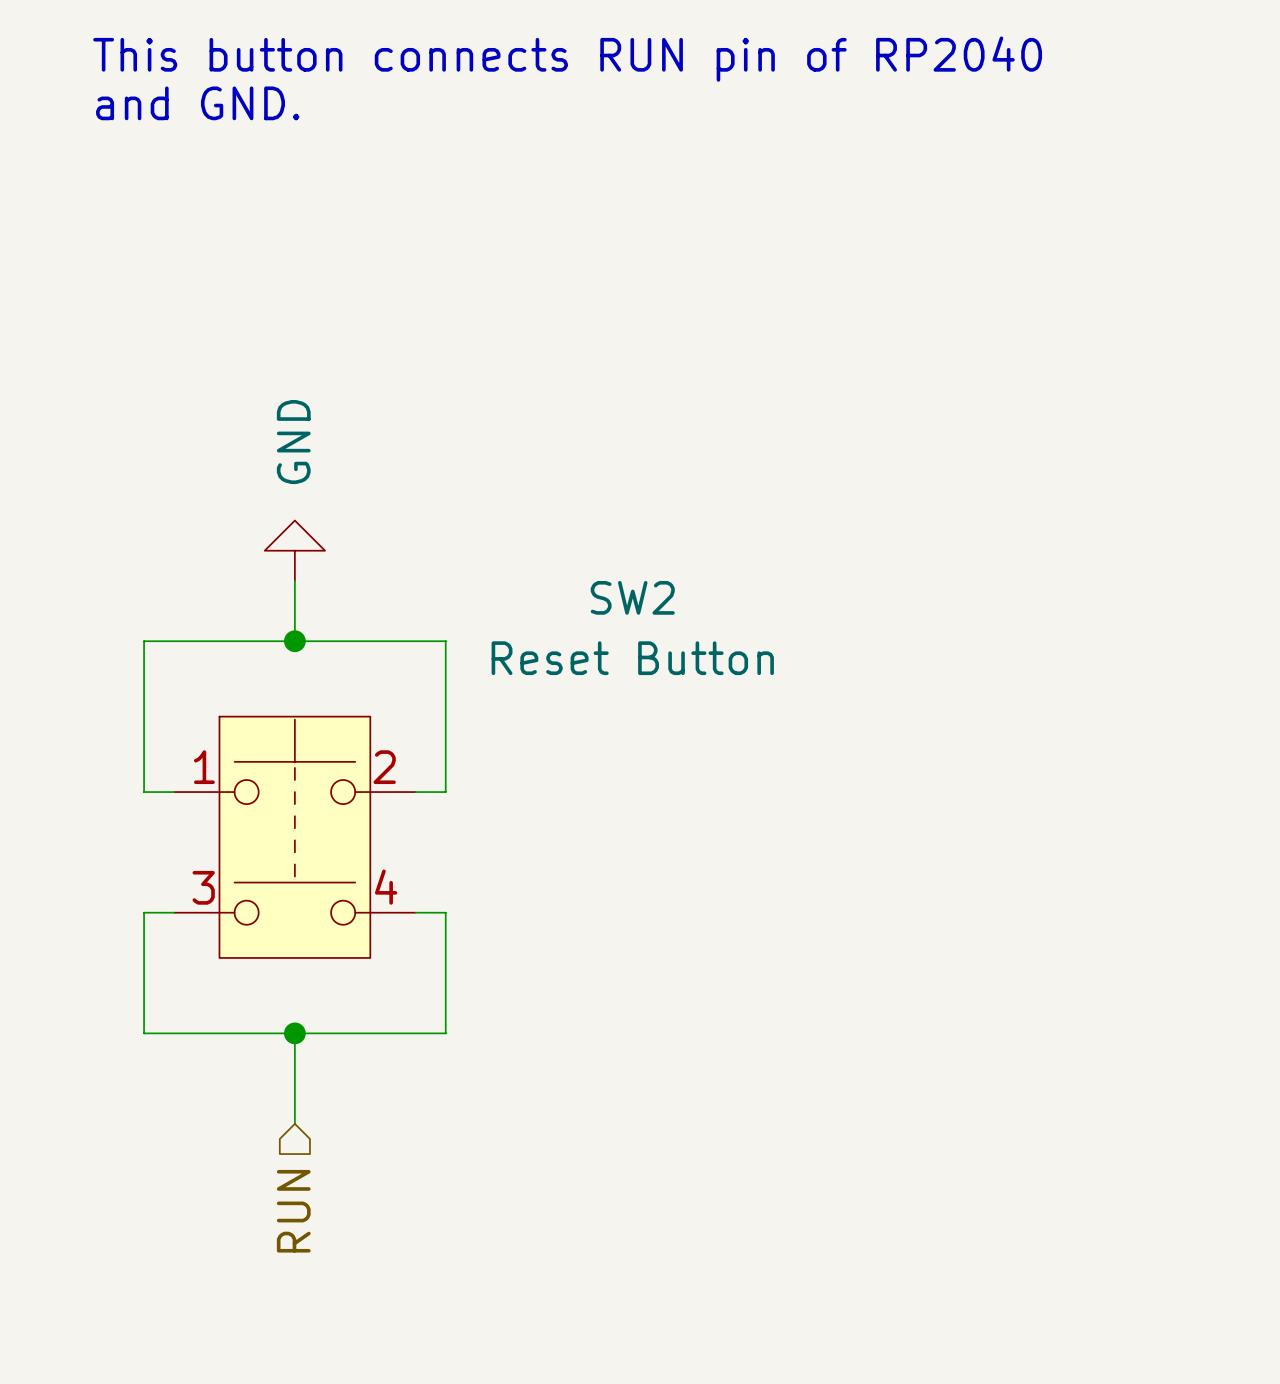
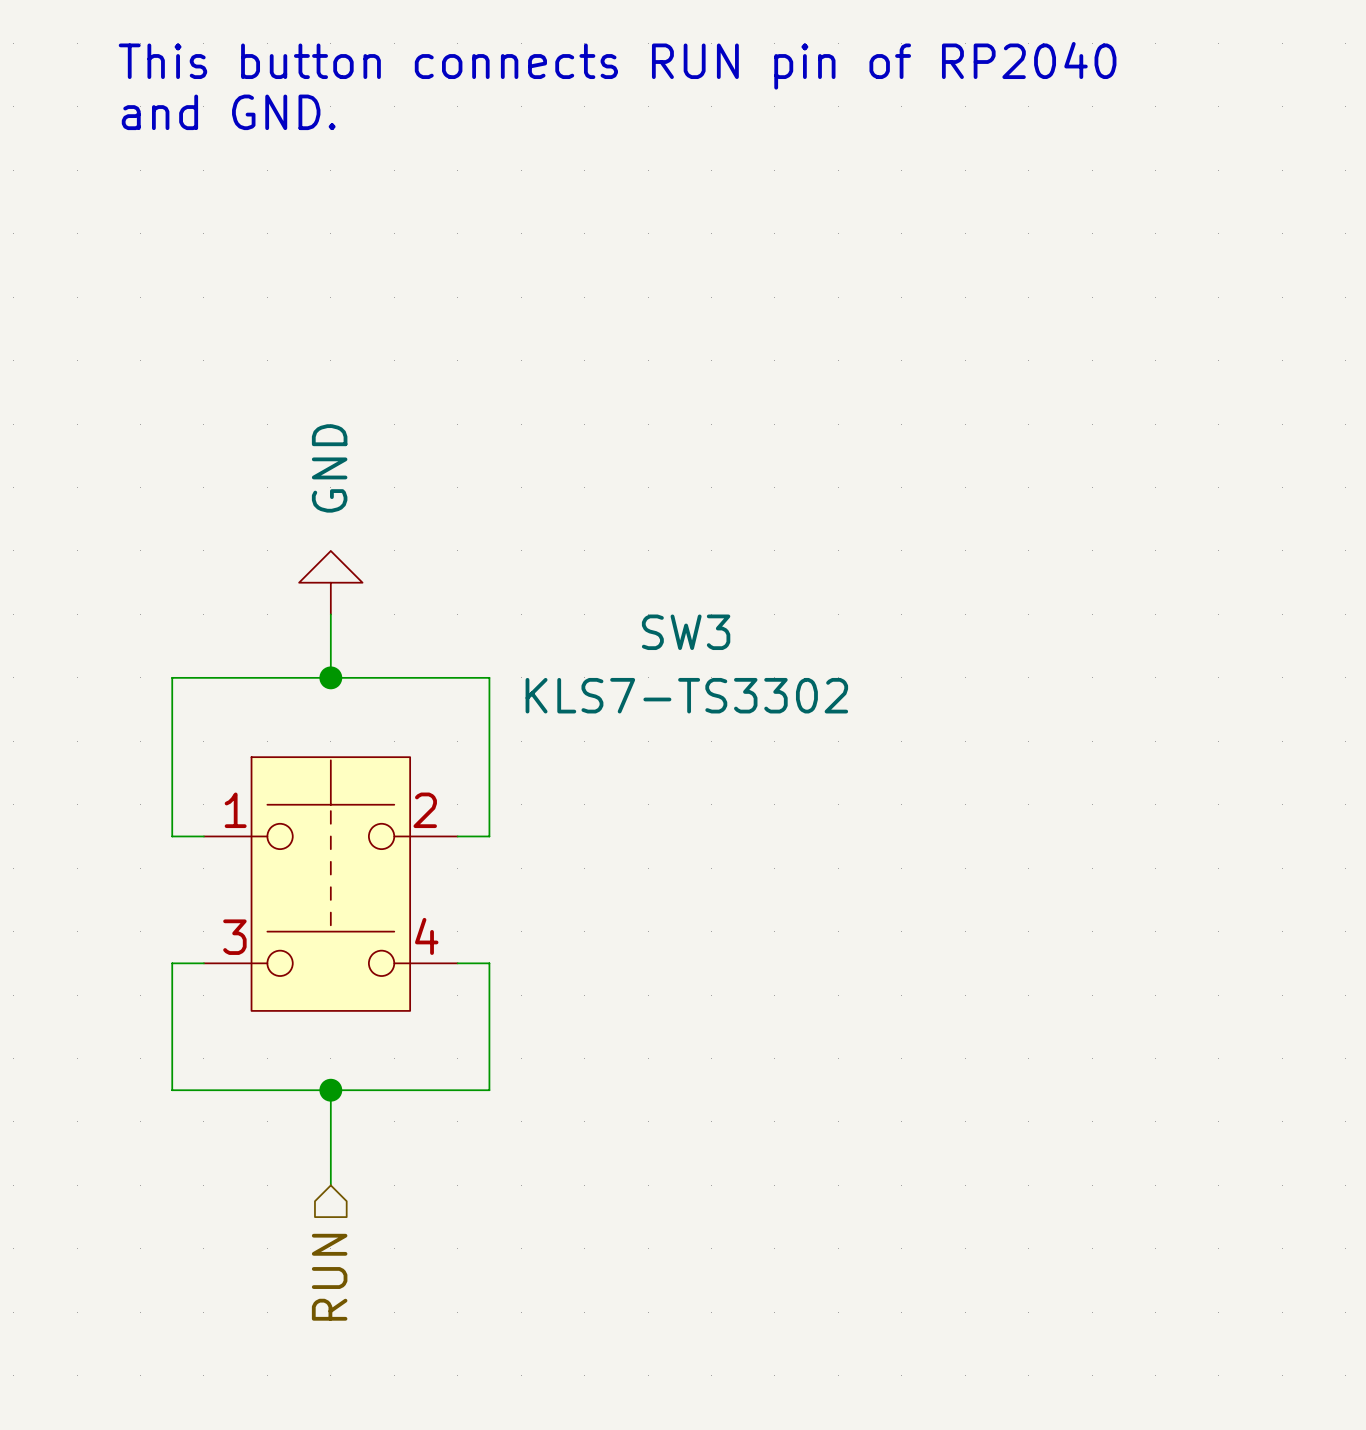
SW2 name: SW2 (632, 597) -> SW3 (686, 632)
SW2 value: Reset Button (632, 658) -> KLS7-TS3302 (686, 695)

